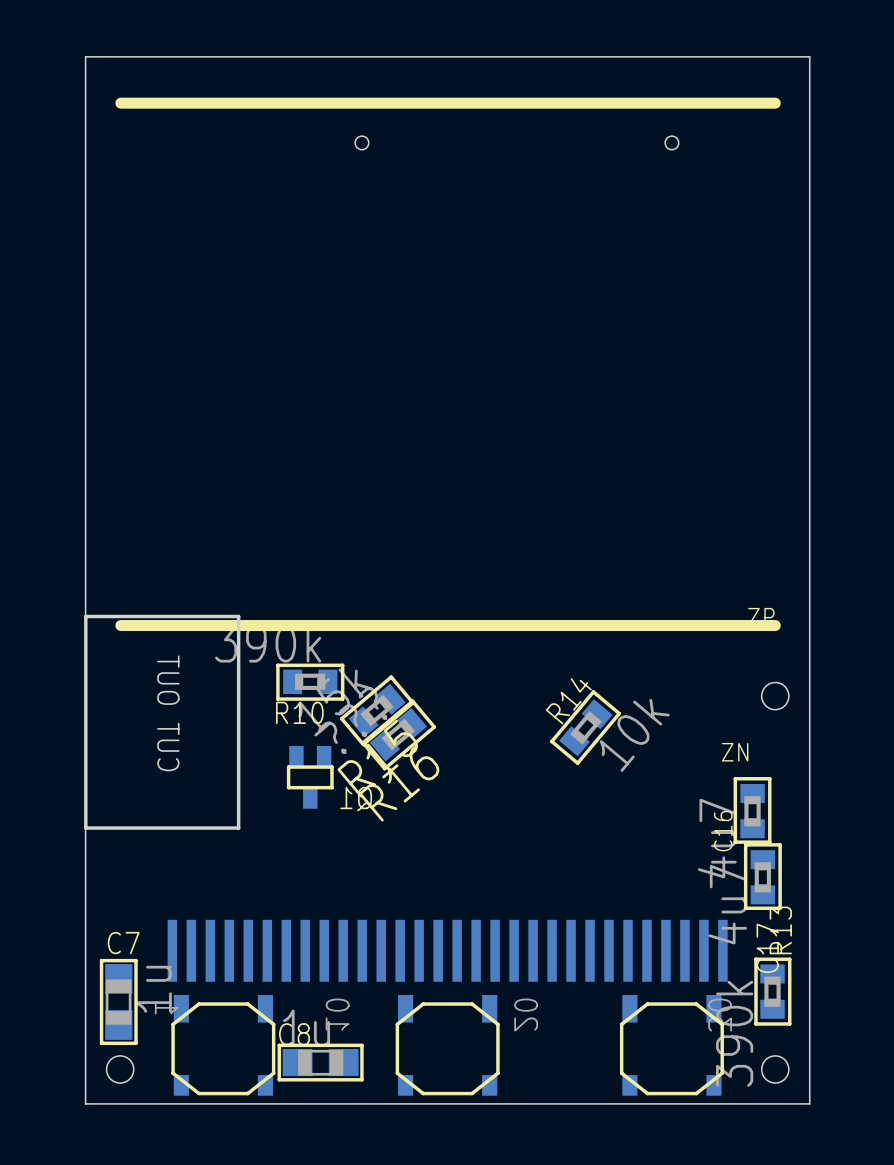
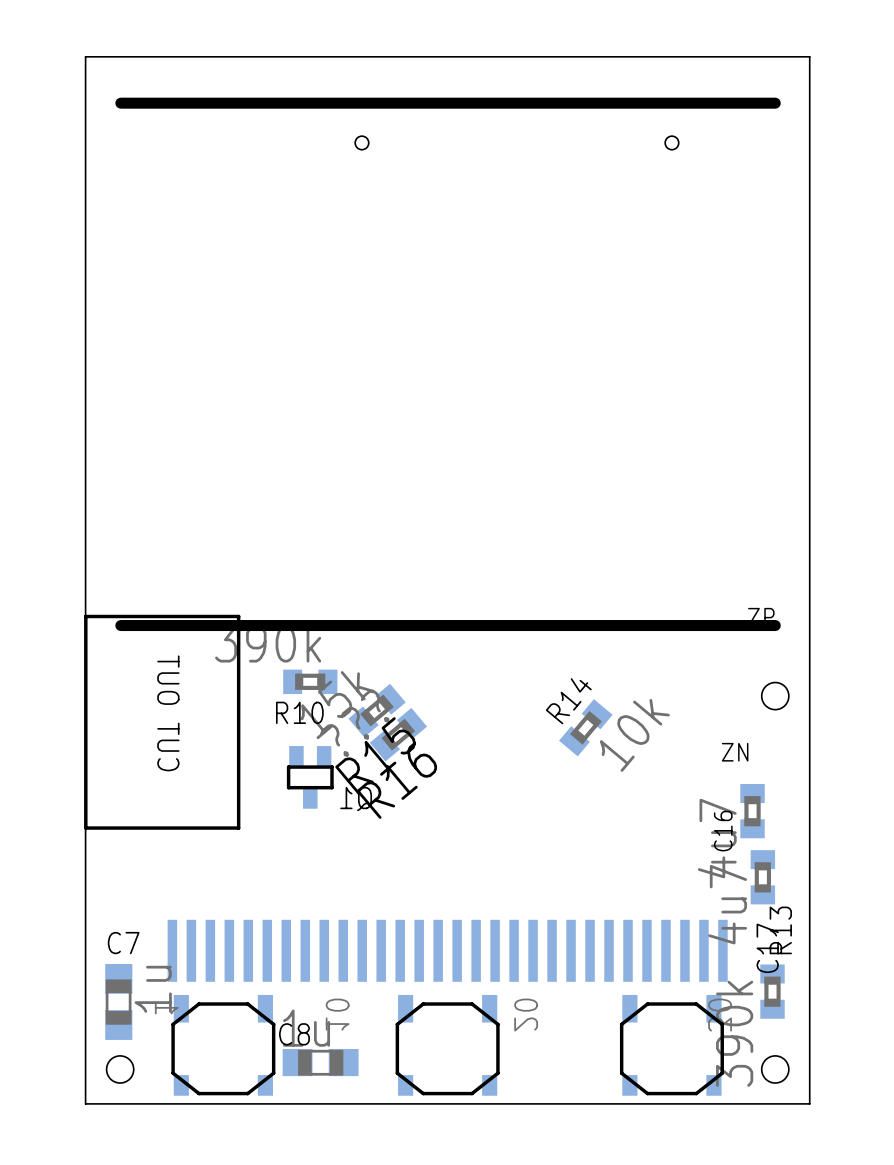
R10 footprint: [276, 663, 345, 701] -> [283, 669, 338, 695]
R15 footprint: [339, 675, 415, 747] -> [348, 683, 406, 738]
R14 footprint: [550, 690, 622, 765] -> [559, 699, 613, 757]
R16 footprint: [361, 699, 437, 771] -> [369, 707, 428, 762]
C16 footprint: [733, 777, 772, 844] -> [740, 784, 765, 839]
C17 footprint: [743, 843, 782, 910] -> [750, 850, 776, 905]
R13 footprint: [754, 957, 792, 1026] -> [760, 964, 785, 1019]
C7 footprint: [99, 958, 138, 1046] -> [105, 963, 133, 1040]
C8 footprint: [277, 1043, 364, 1082] -> [282, 1049, 359, 1077]

